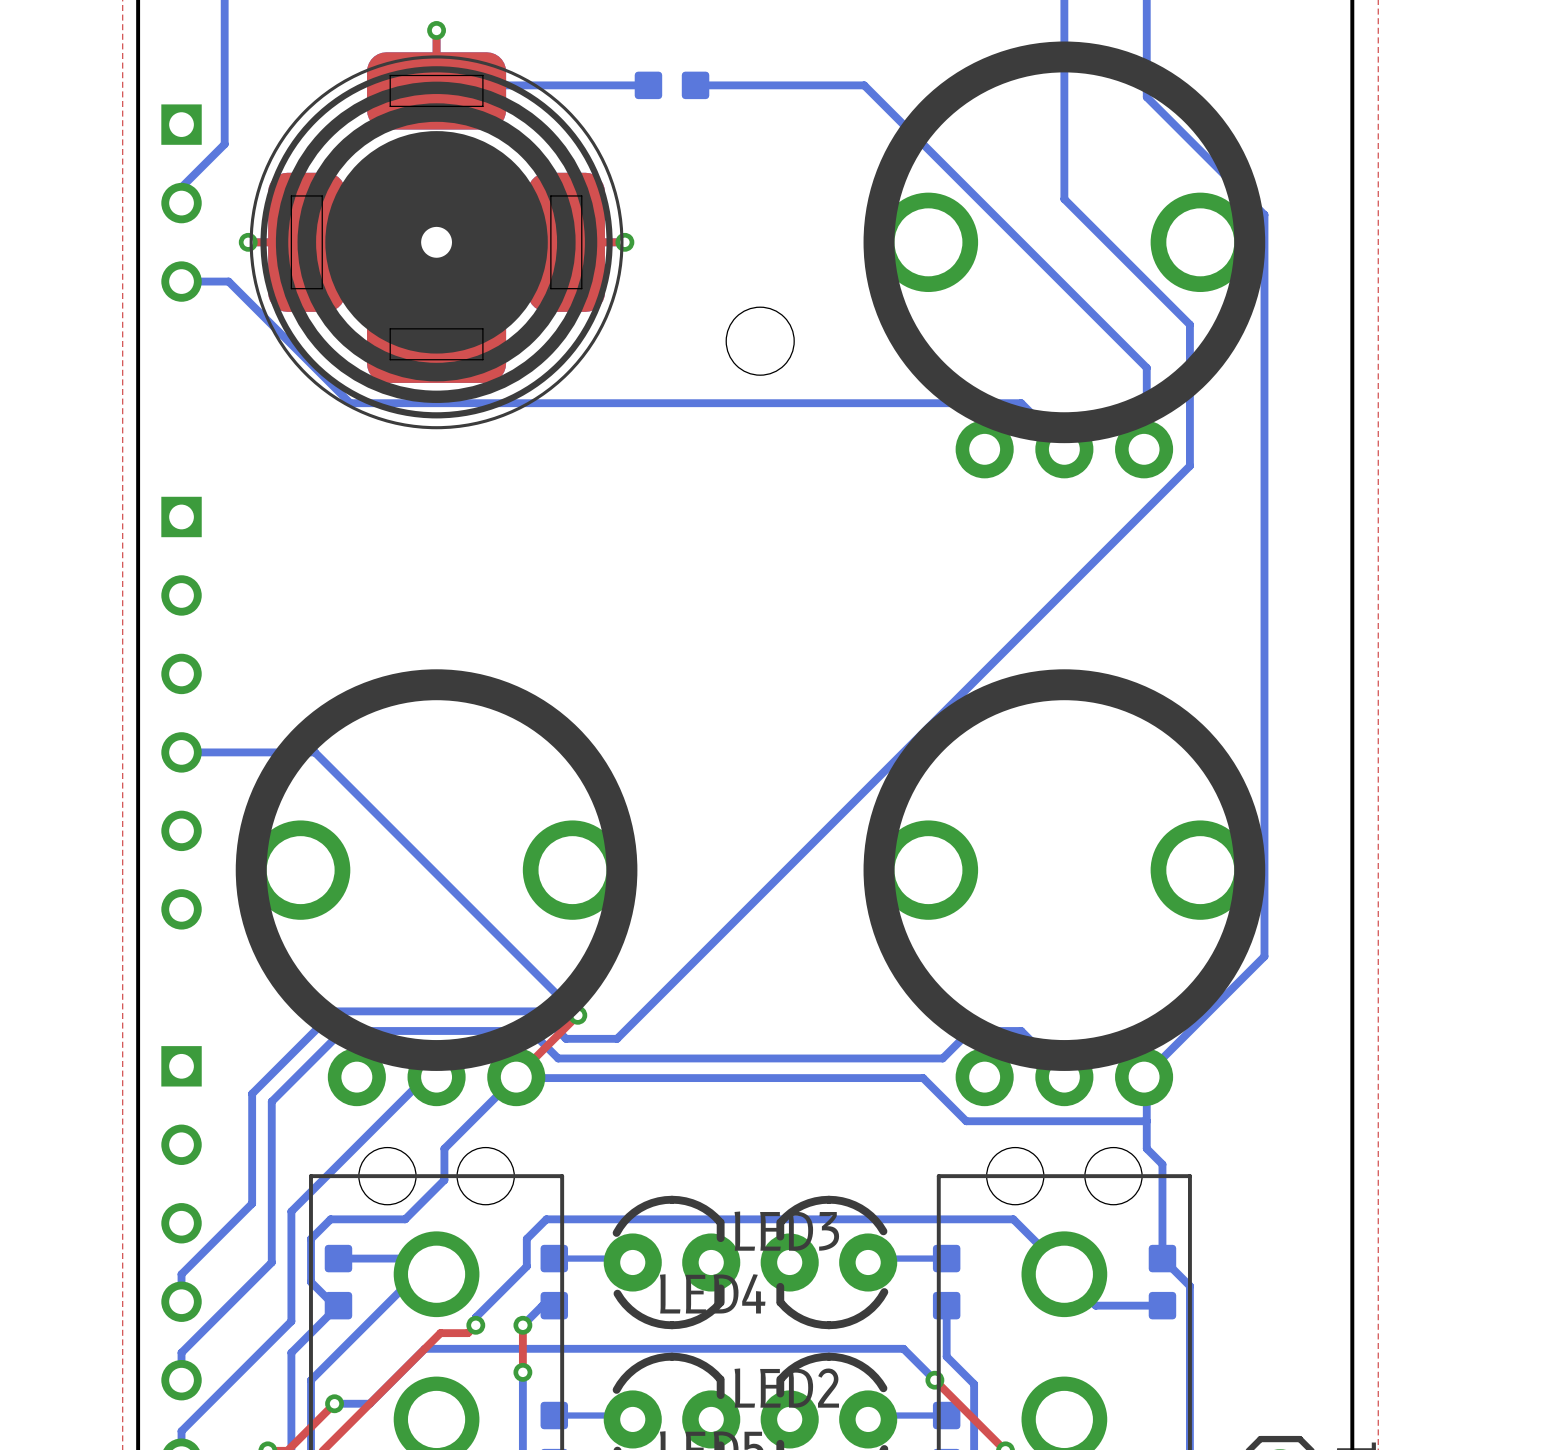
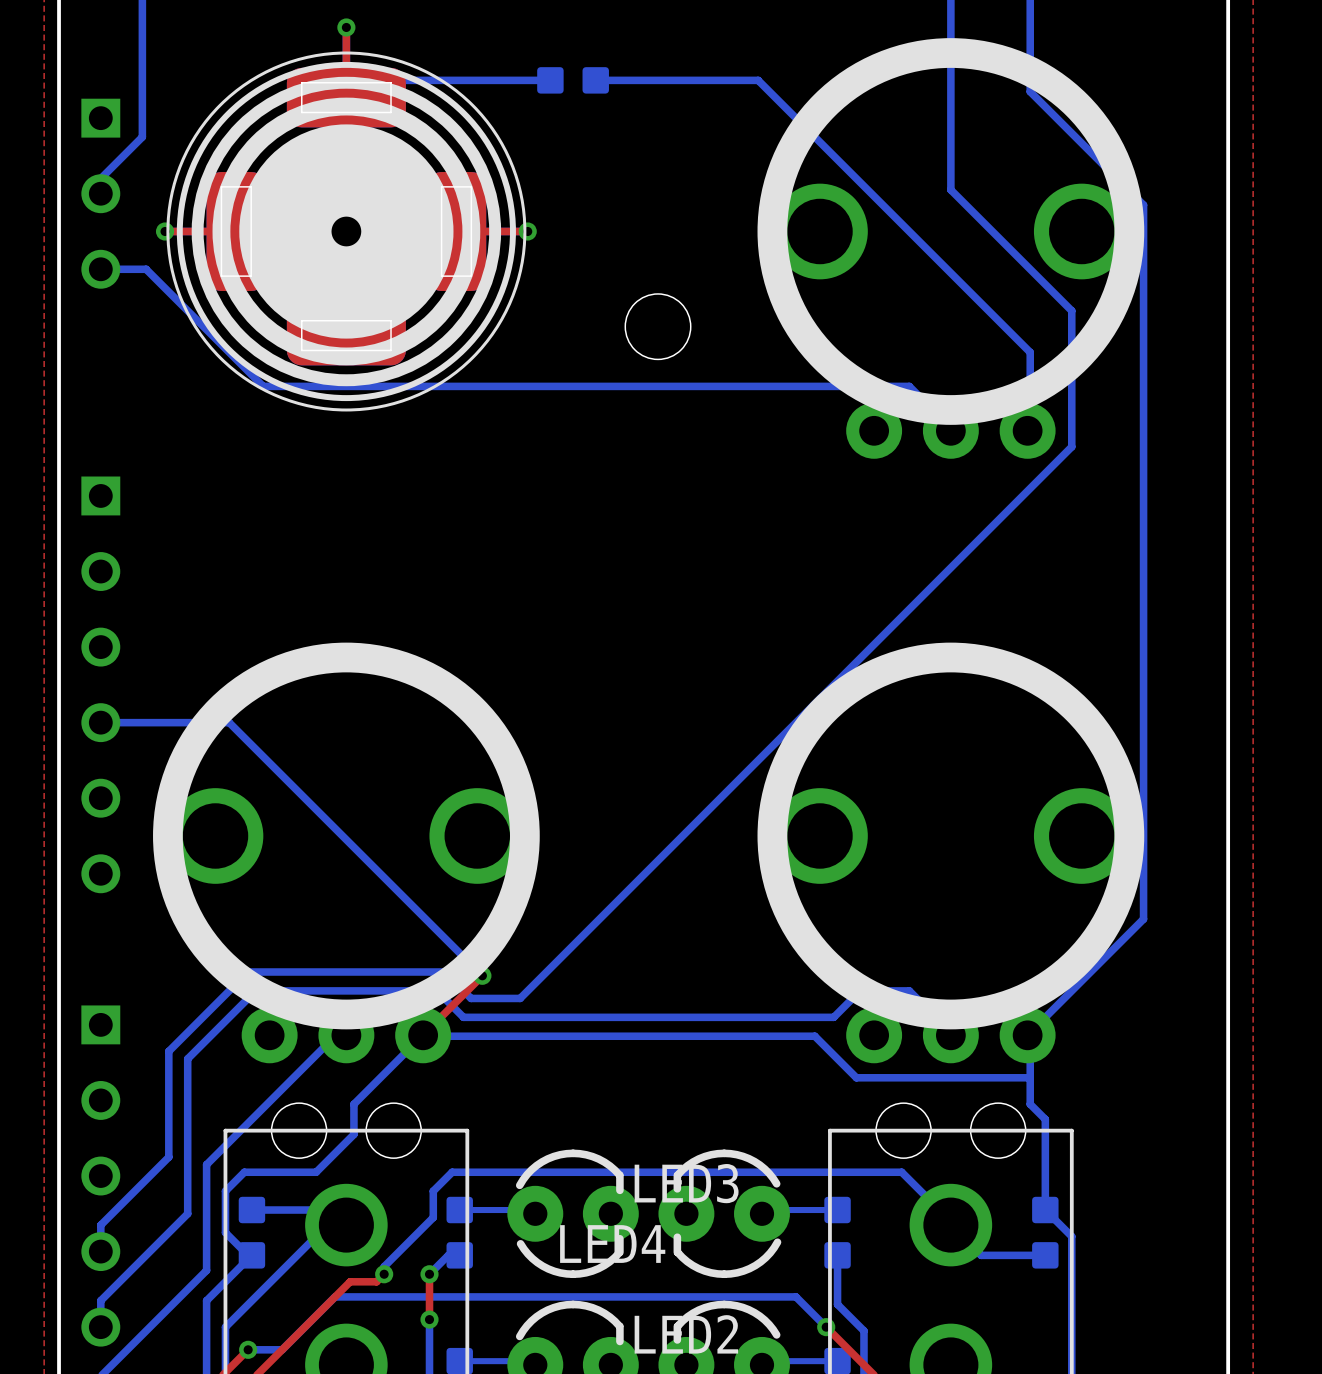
part footprint: [249, 52, 624, 430] -> [166, 51, 527, 412]

